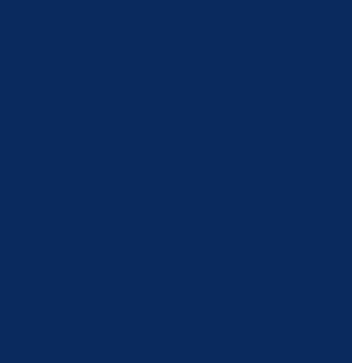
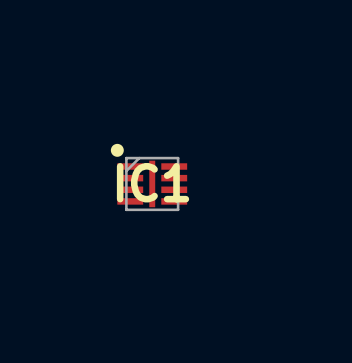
IC1: none -> (149, 177)

